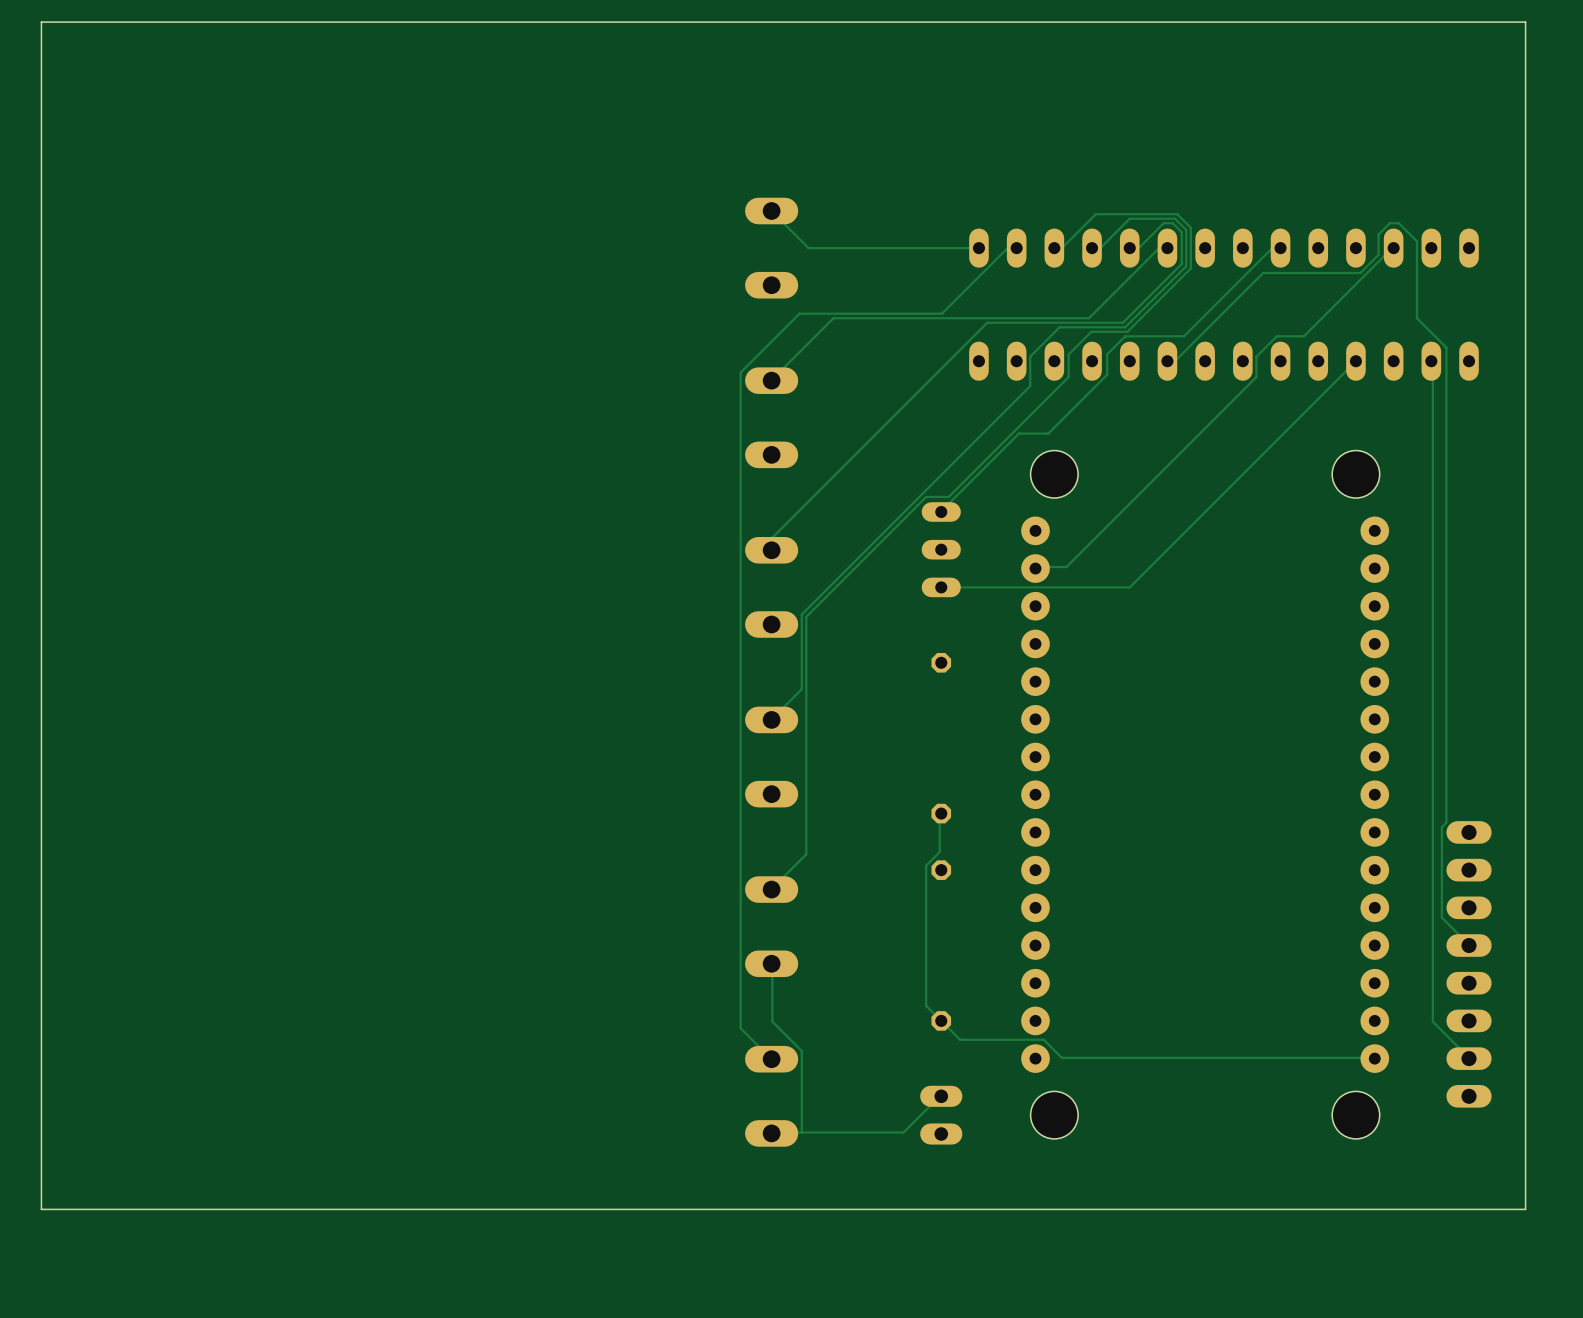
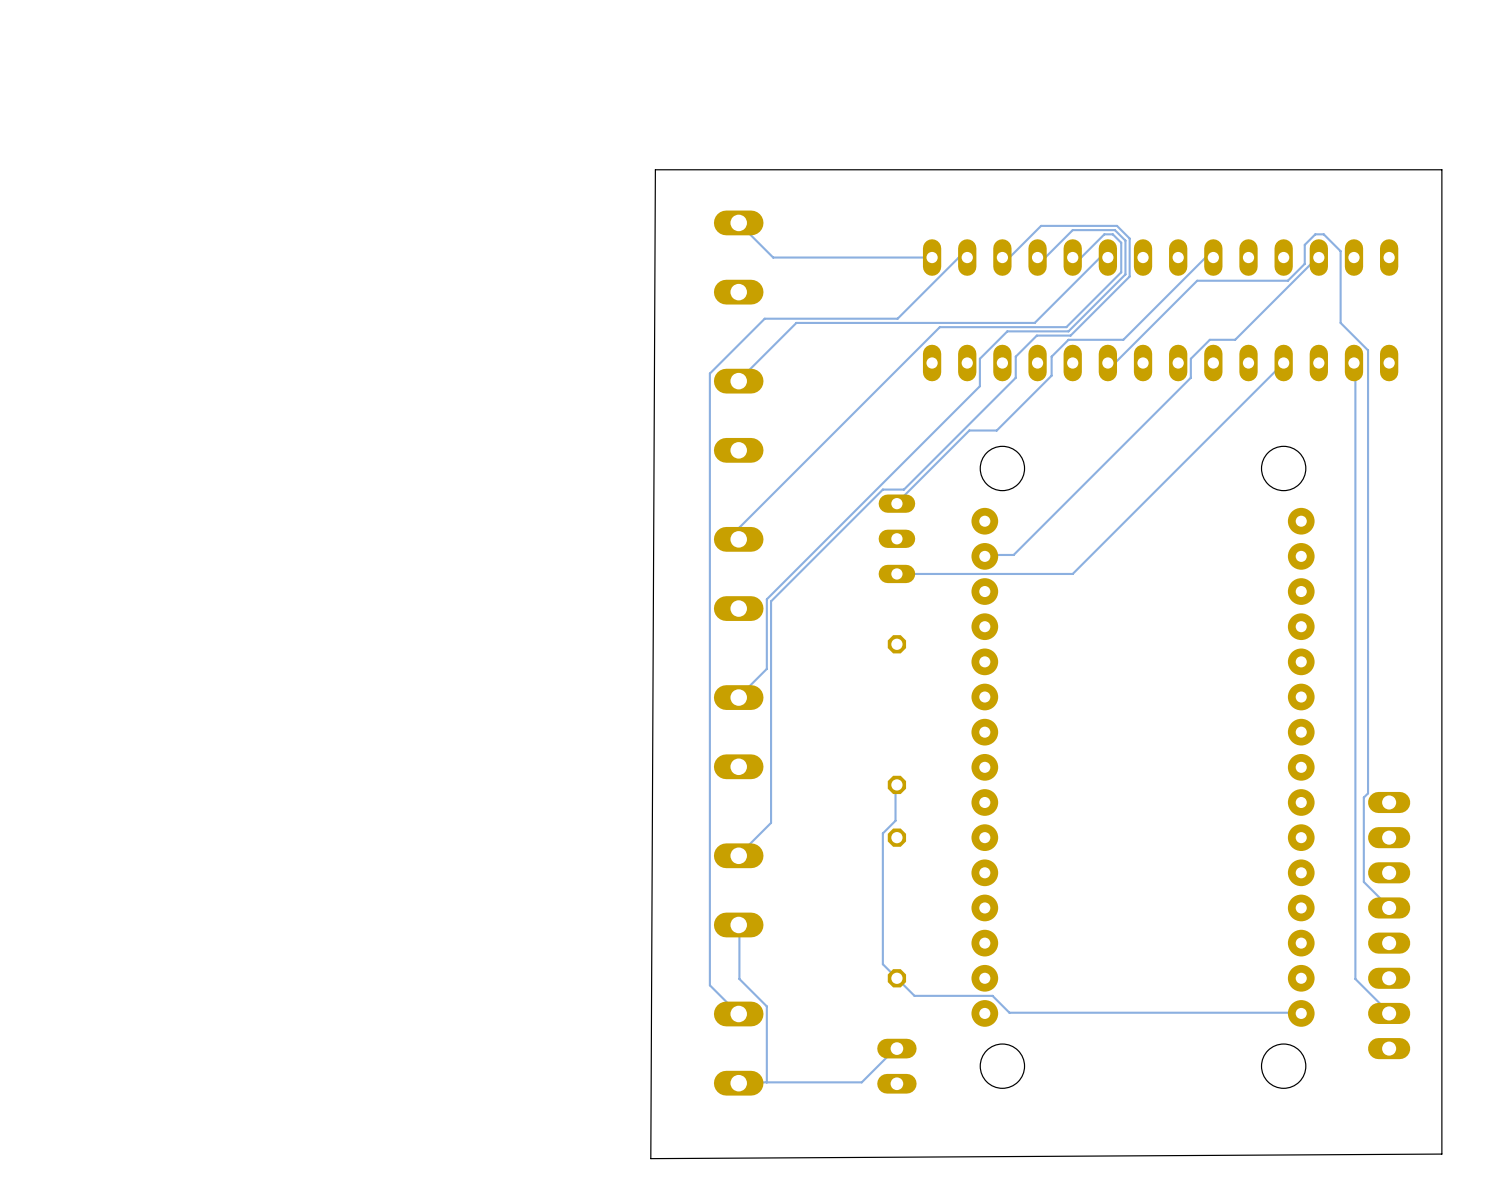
board edge: (1525, 154) (1525, 22) (41, 22) (41, 1209) (1525, 1209) -> (1441, 169) (655, 169) (650, 1158) (1441, 1154)

